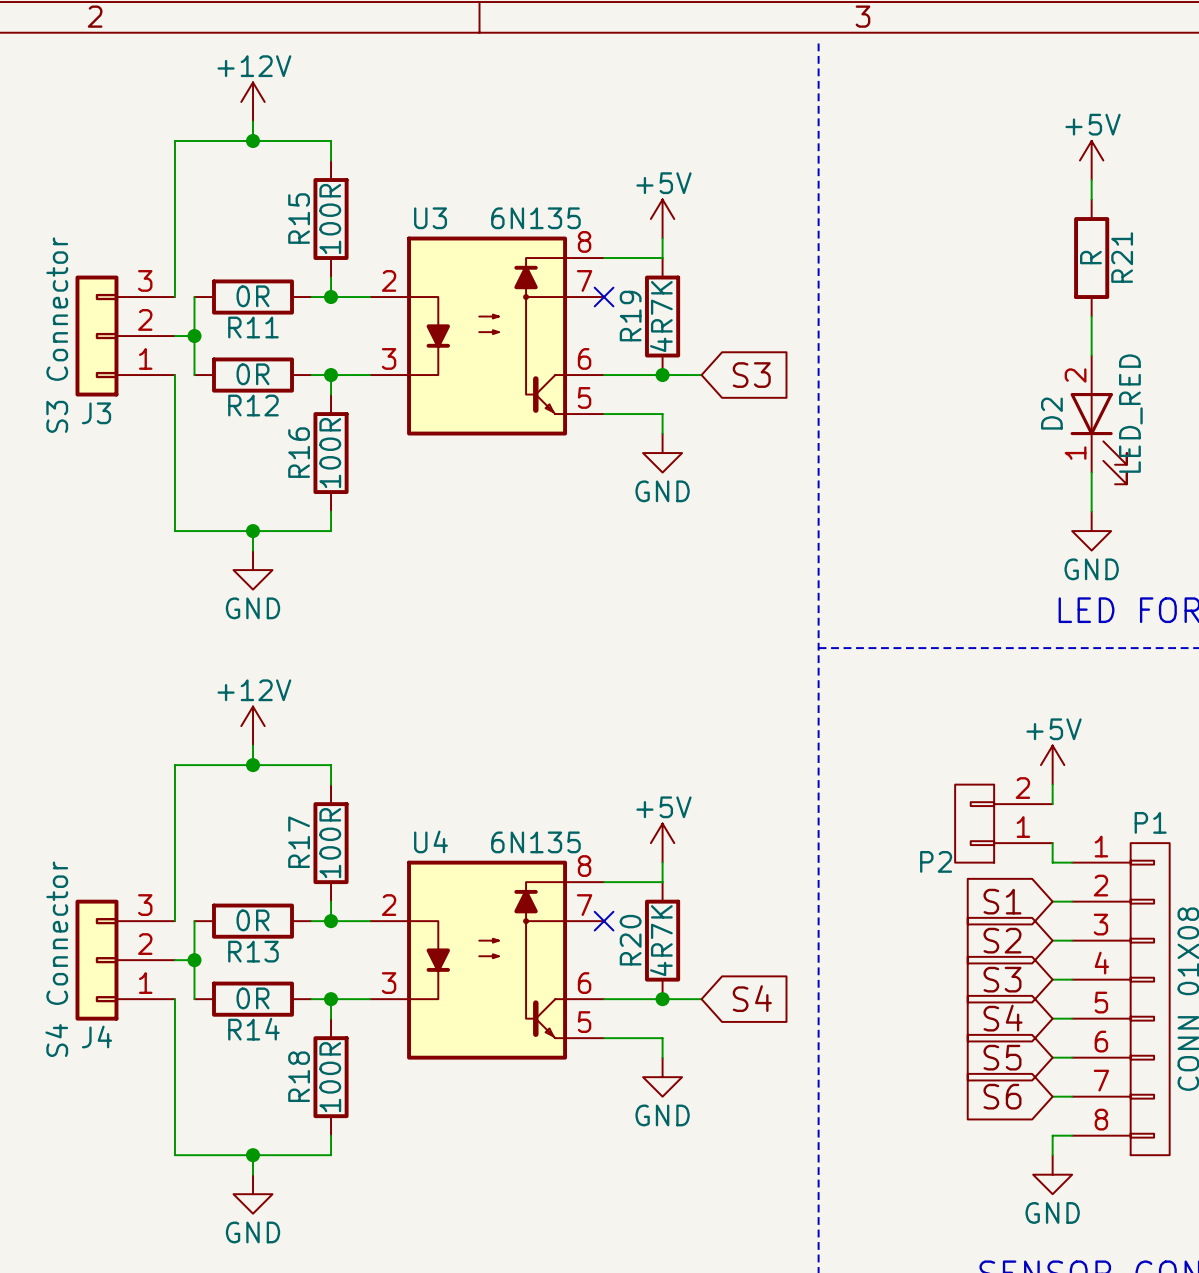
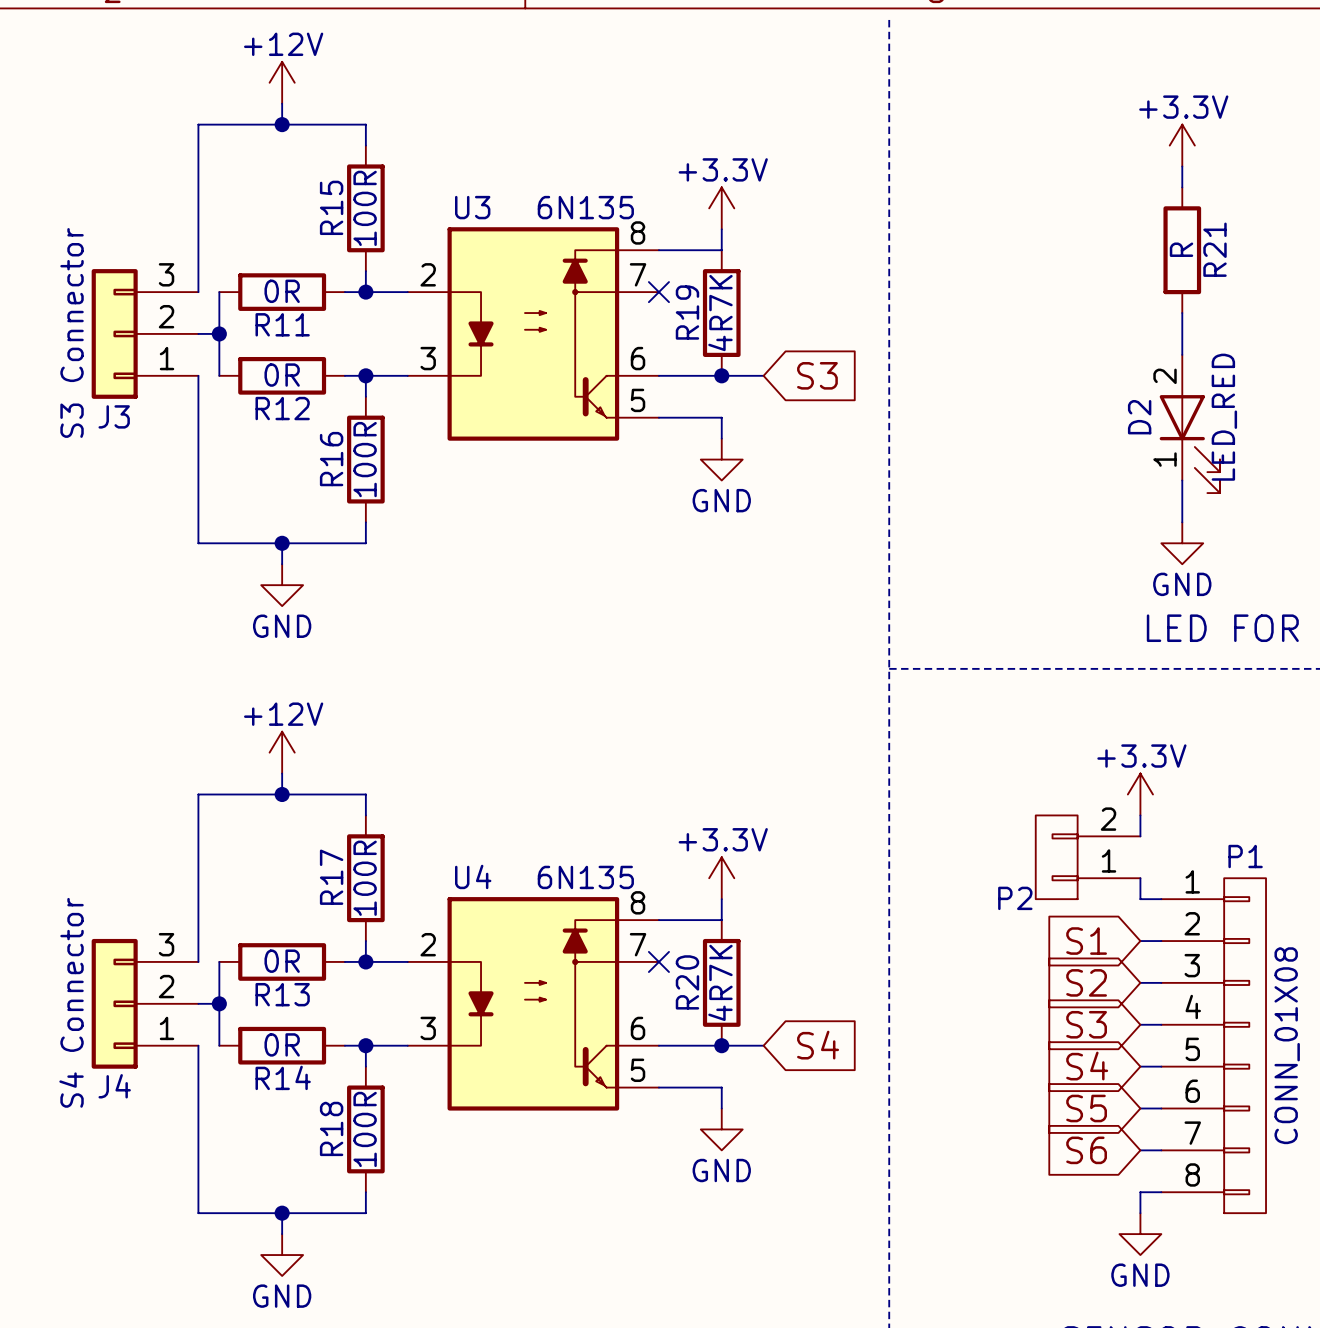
power symbol: +5V (1091, 160) -> +3.3V (1182, 145)
power symbol: +5V (662, 219) -> +3.3V (721, 208)
power symbol: +5V (1052, 765) -> +3.3V (1140, 794)
power symbol: +5V (662, 843) -> +3.3V (721, 878)

